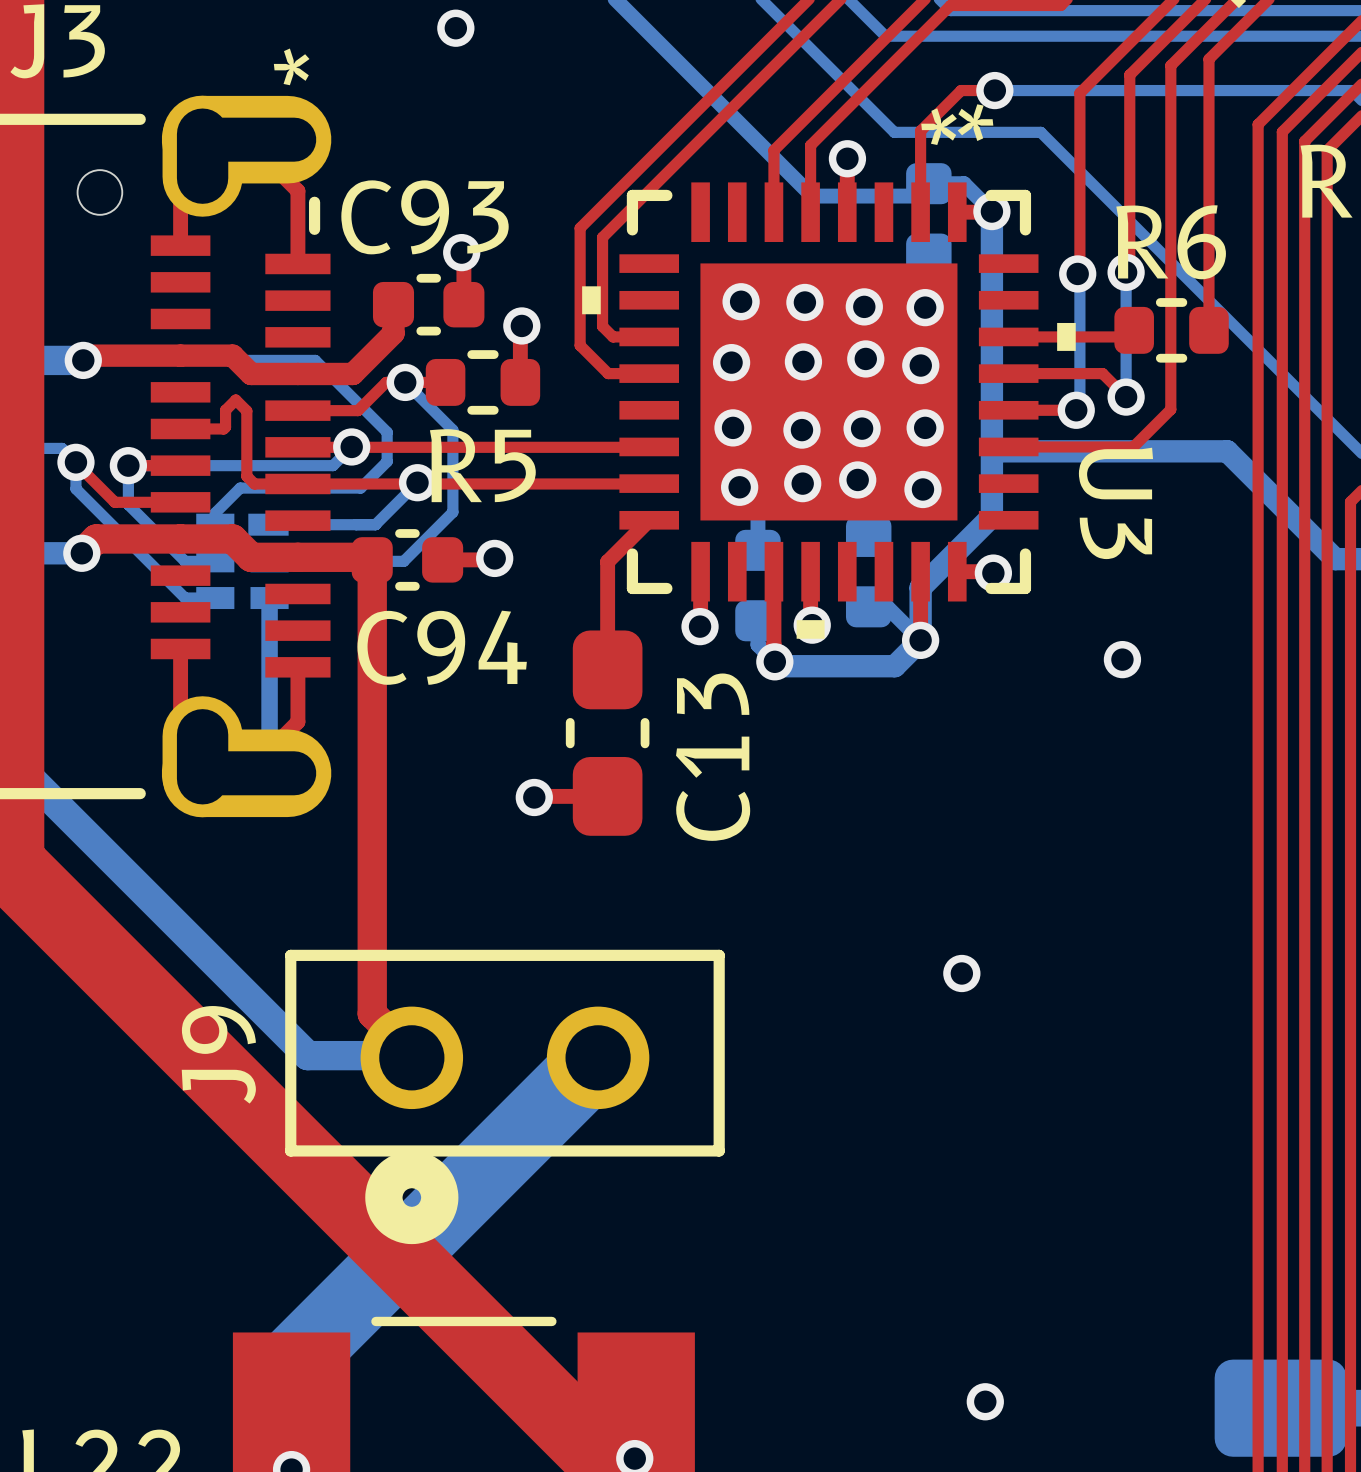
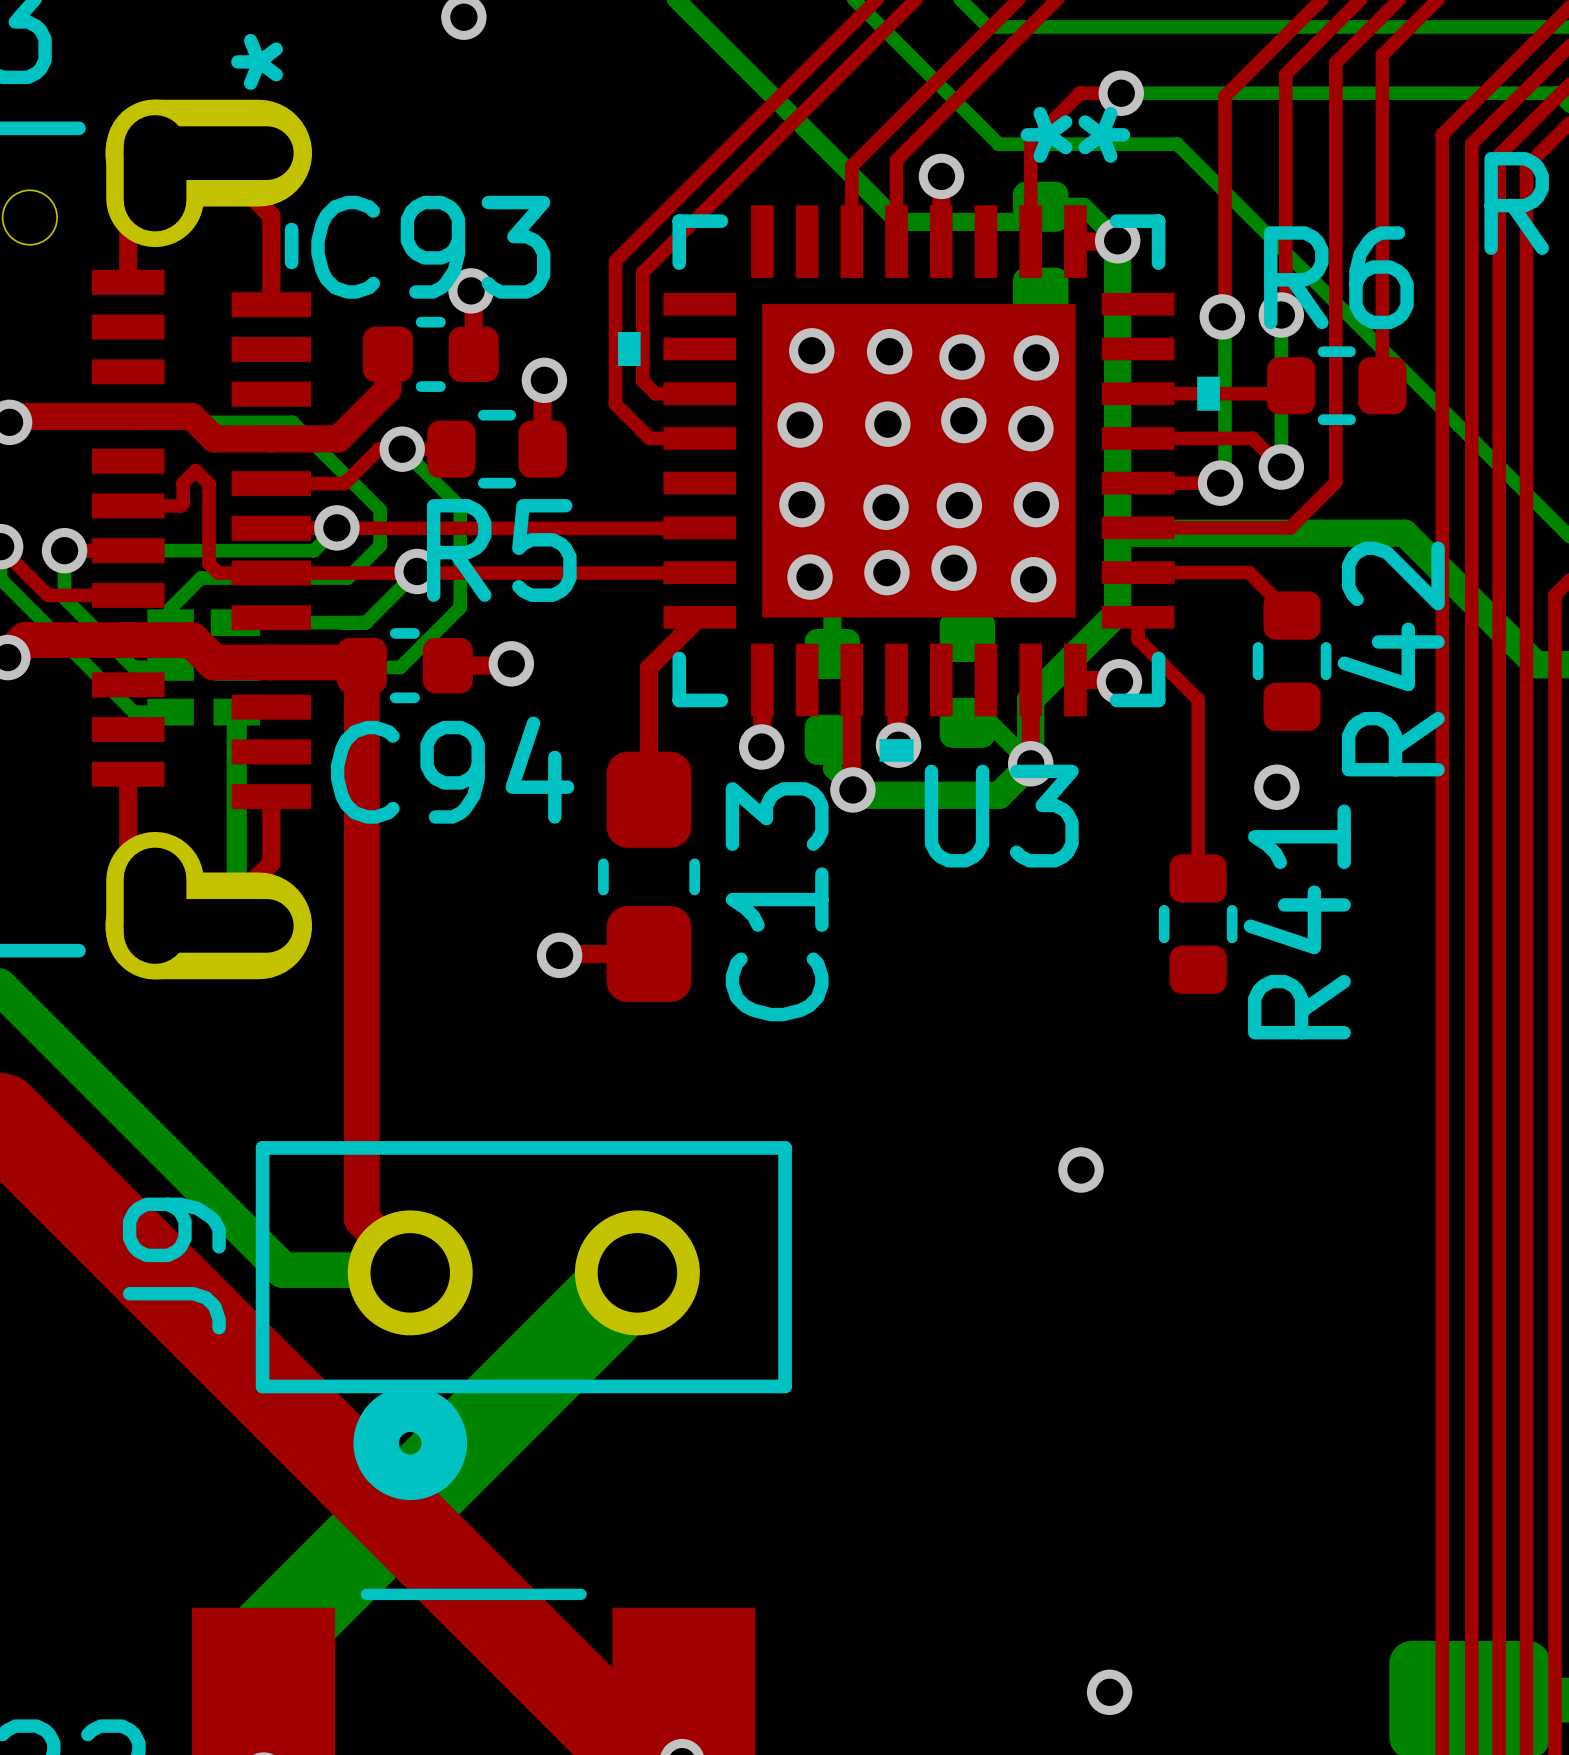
top track: none -> (1138, 572) (1249, 572) (1292, 615)
U3 name rotation: 0° (1115, 503) -> 90° counterclockwise (1001, 816)
U3 name position: U3 (1115, 503) -> U3 (1001, 816)
top track: none -> (1138, 617) (1138, 639) (1198, 699) (1198, 878)
R42: none -> (1292, 661)
R41: none -> (1198, 924)

